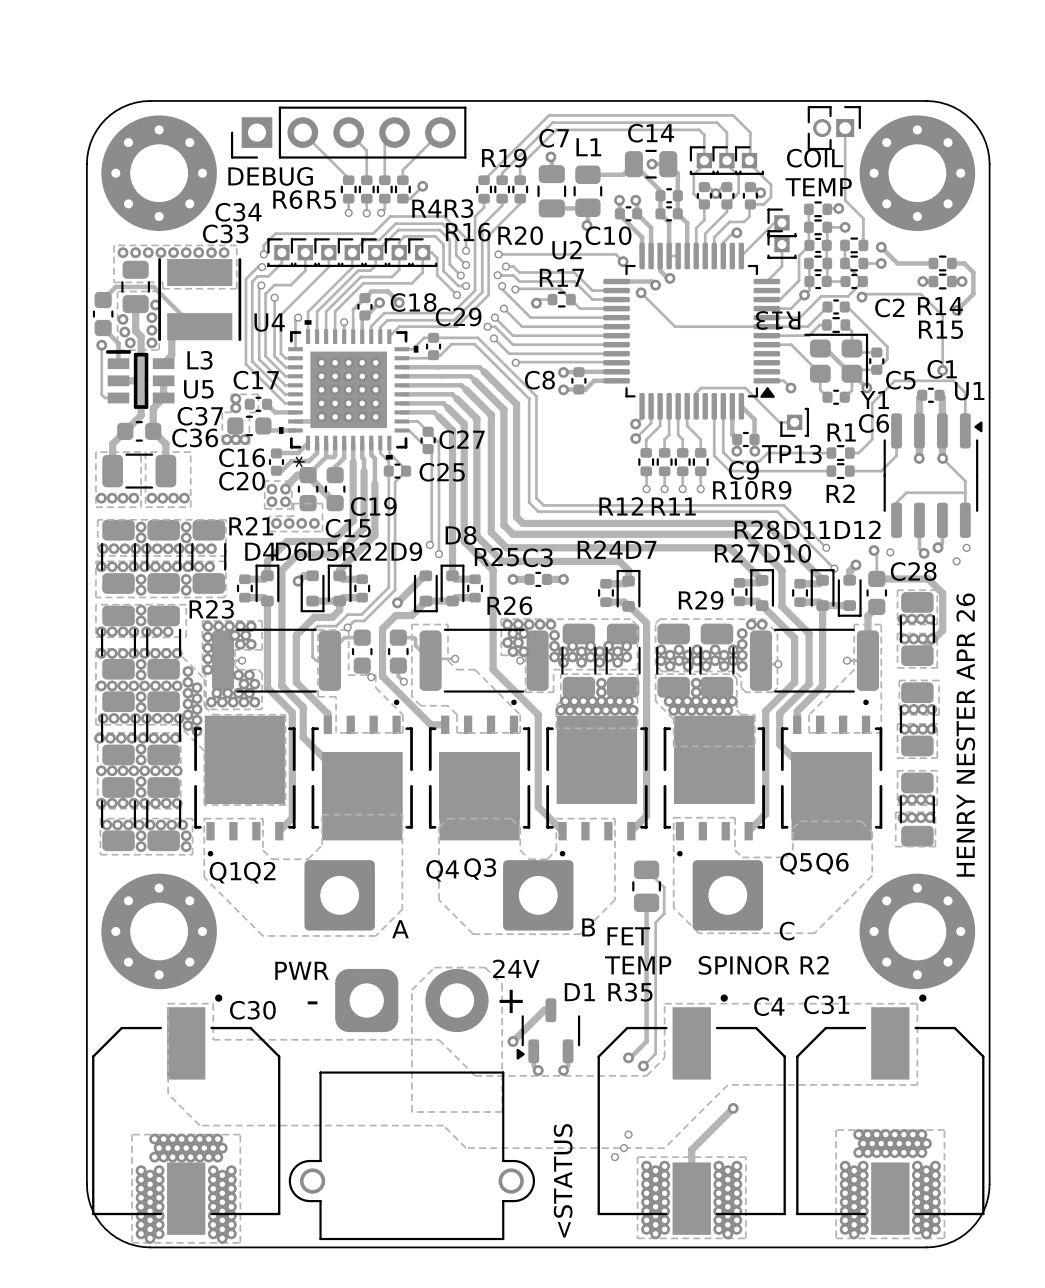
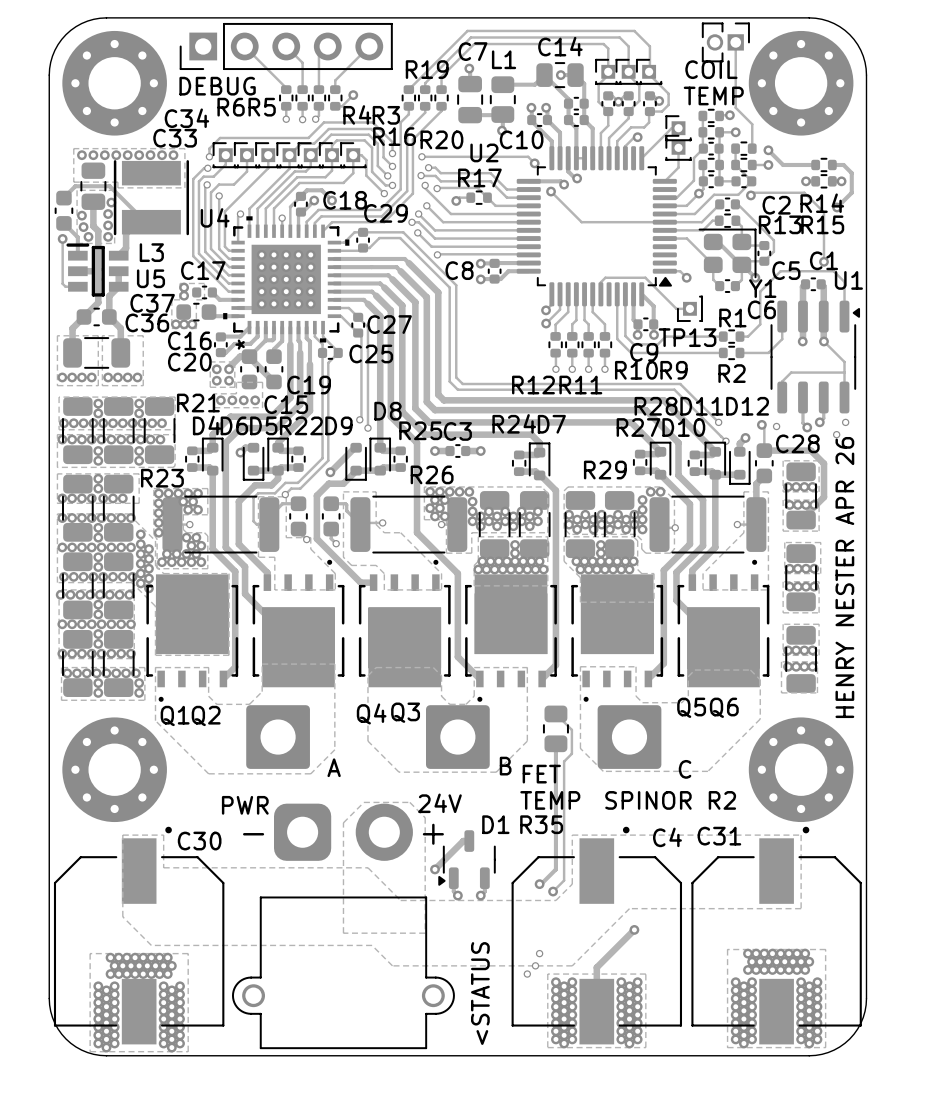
R13 name rotation: 0° (778, 320) -> 180° (780, 224)
R13 name position: R13 (778, 320) -> R13 (780, 224)

